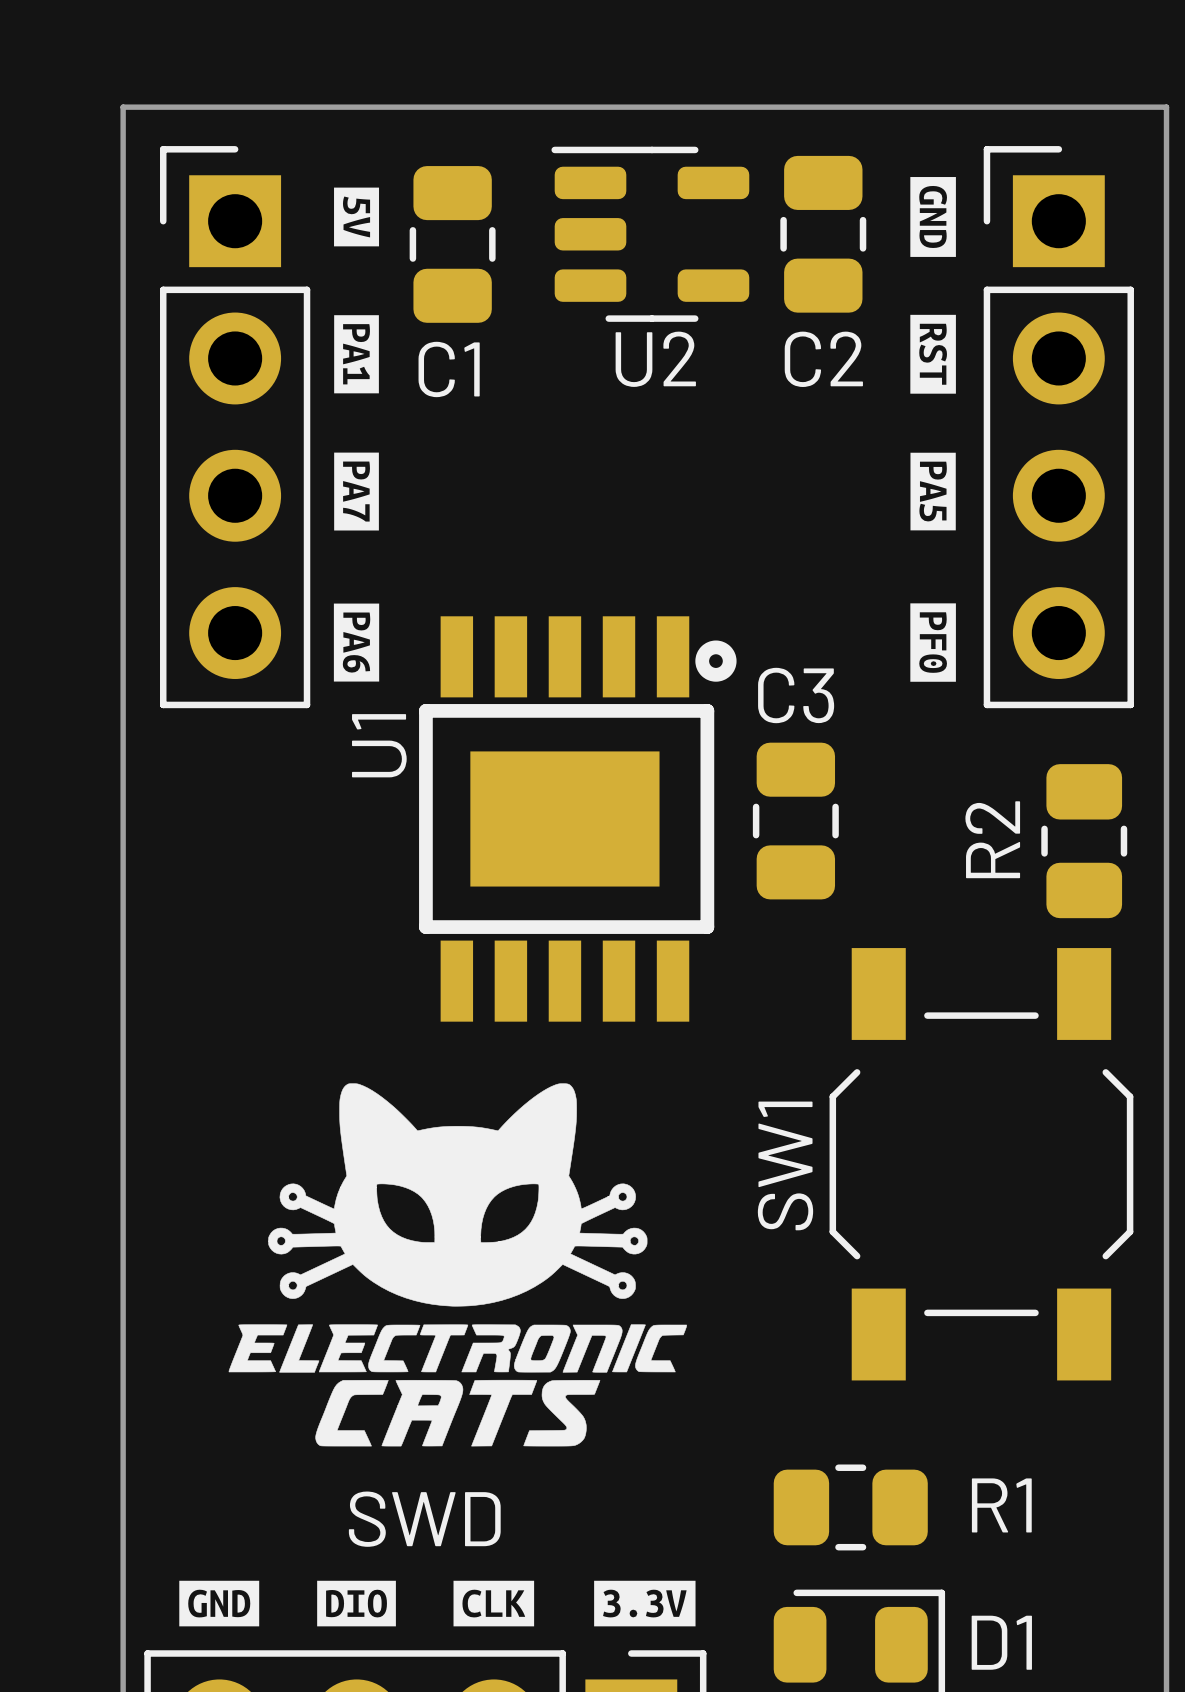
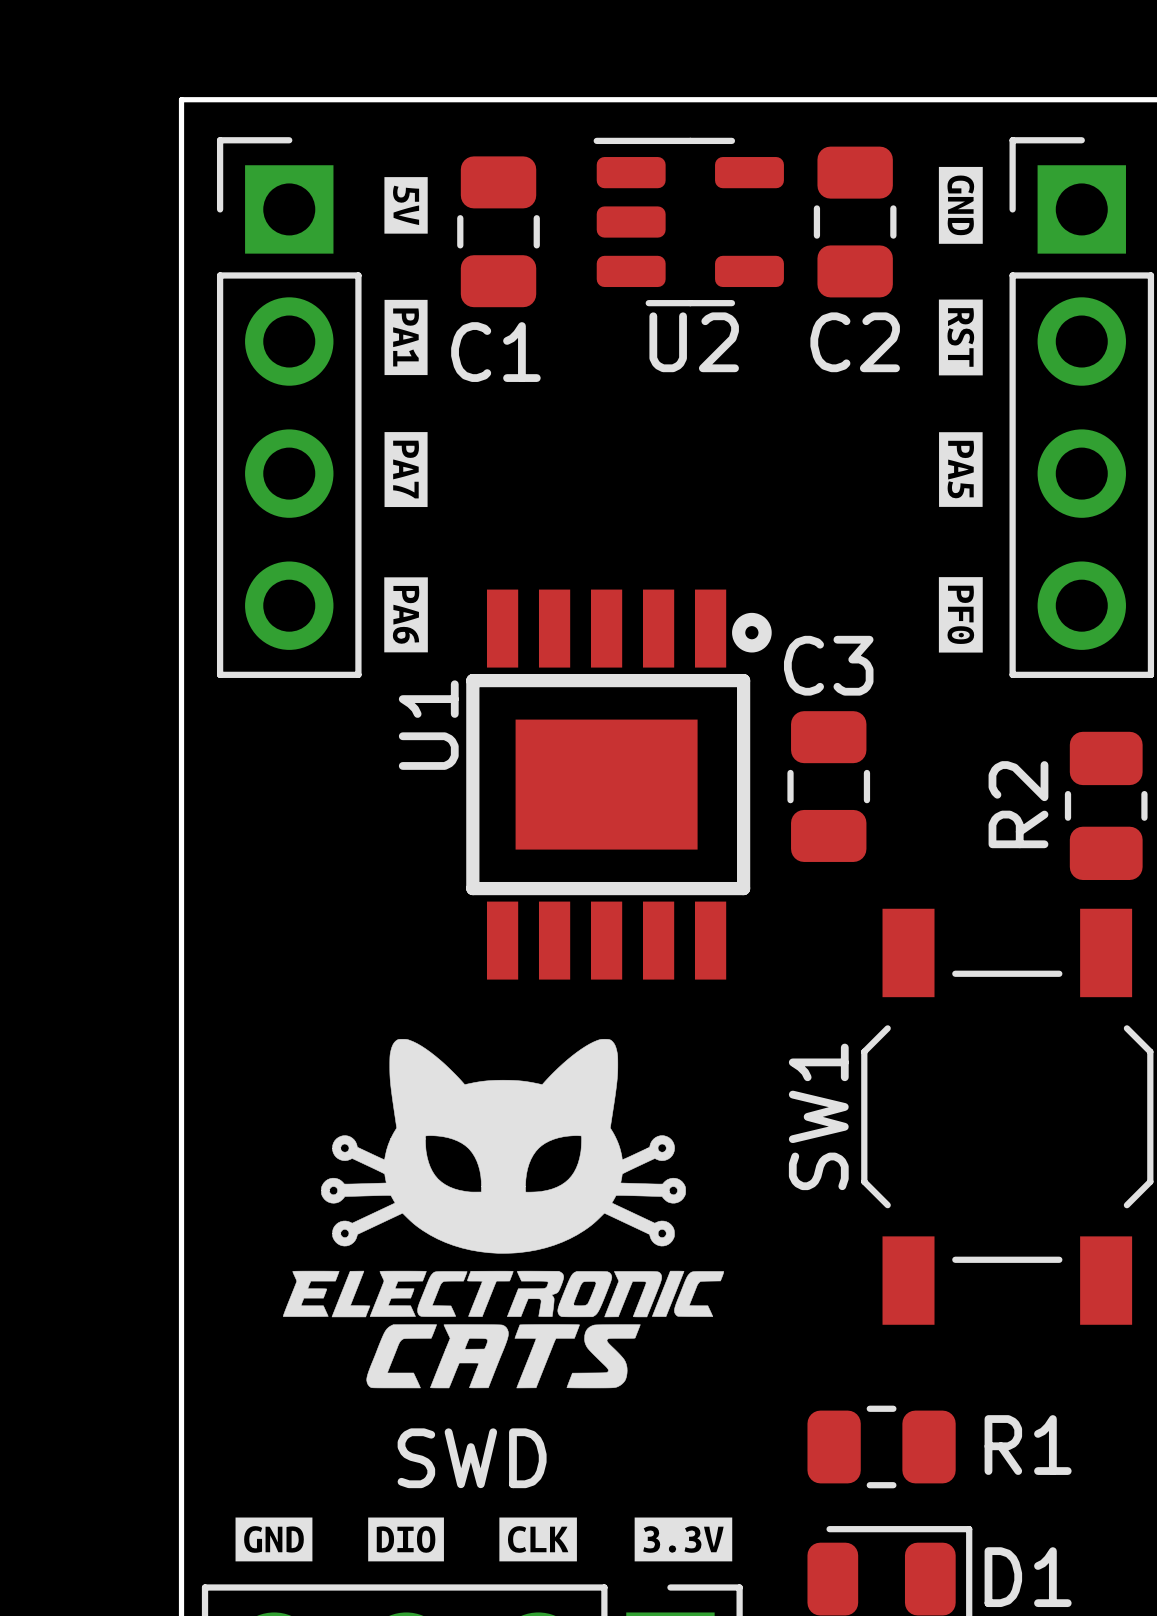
U1 name position: U1 (379, 745) -> U1 (428, 725)

